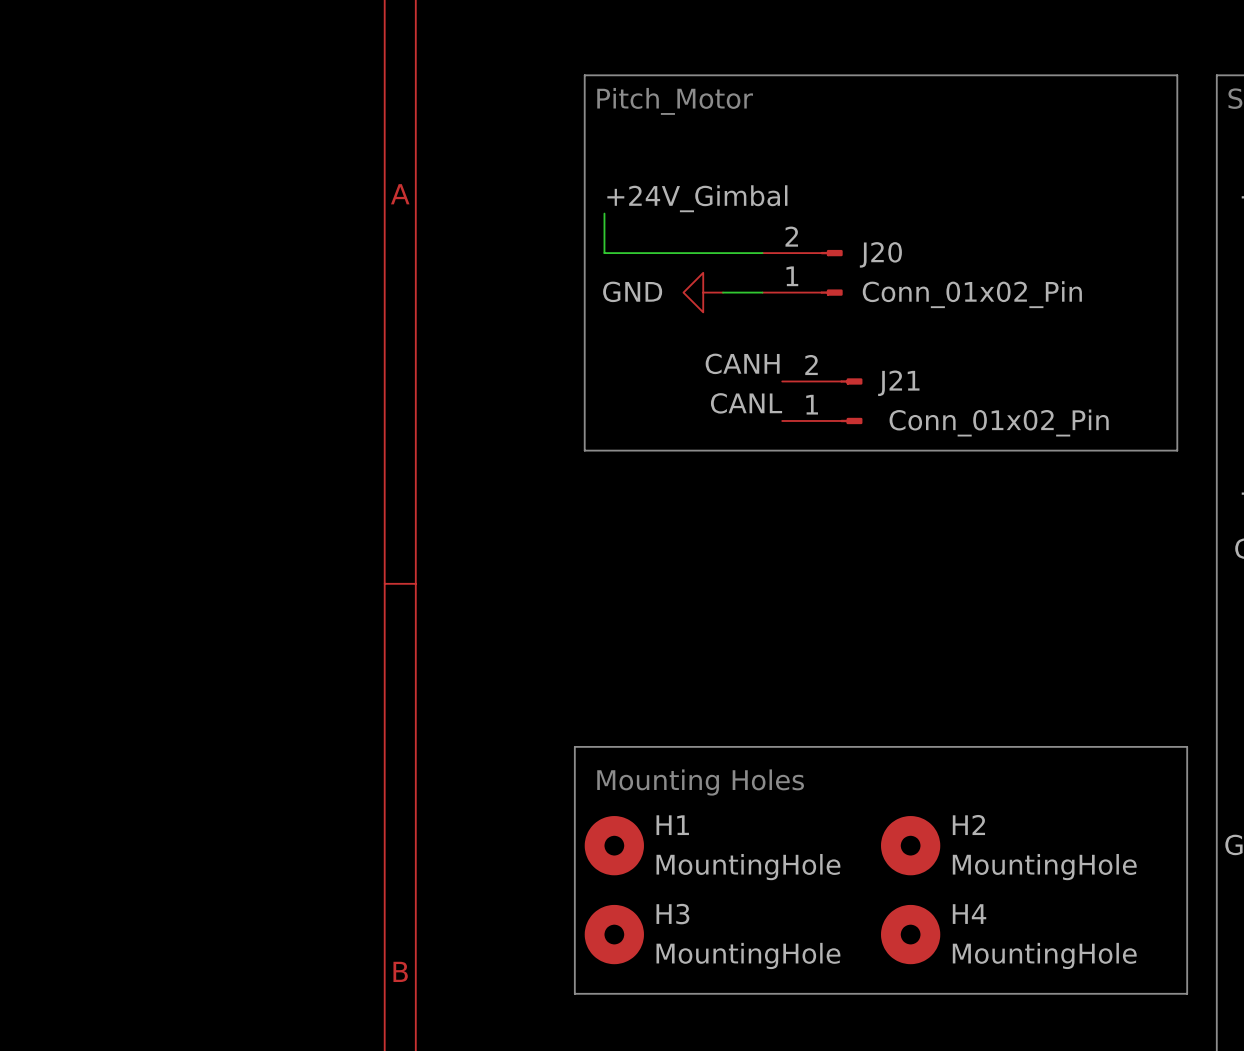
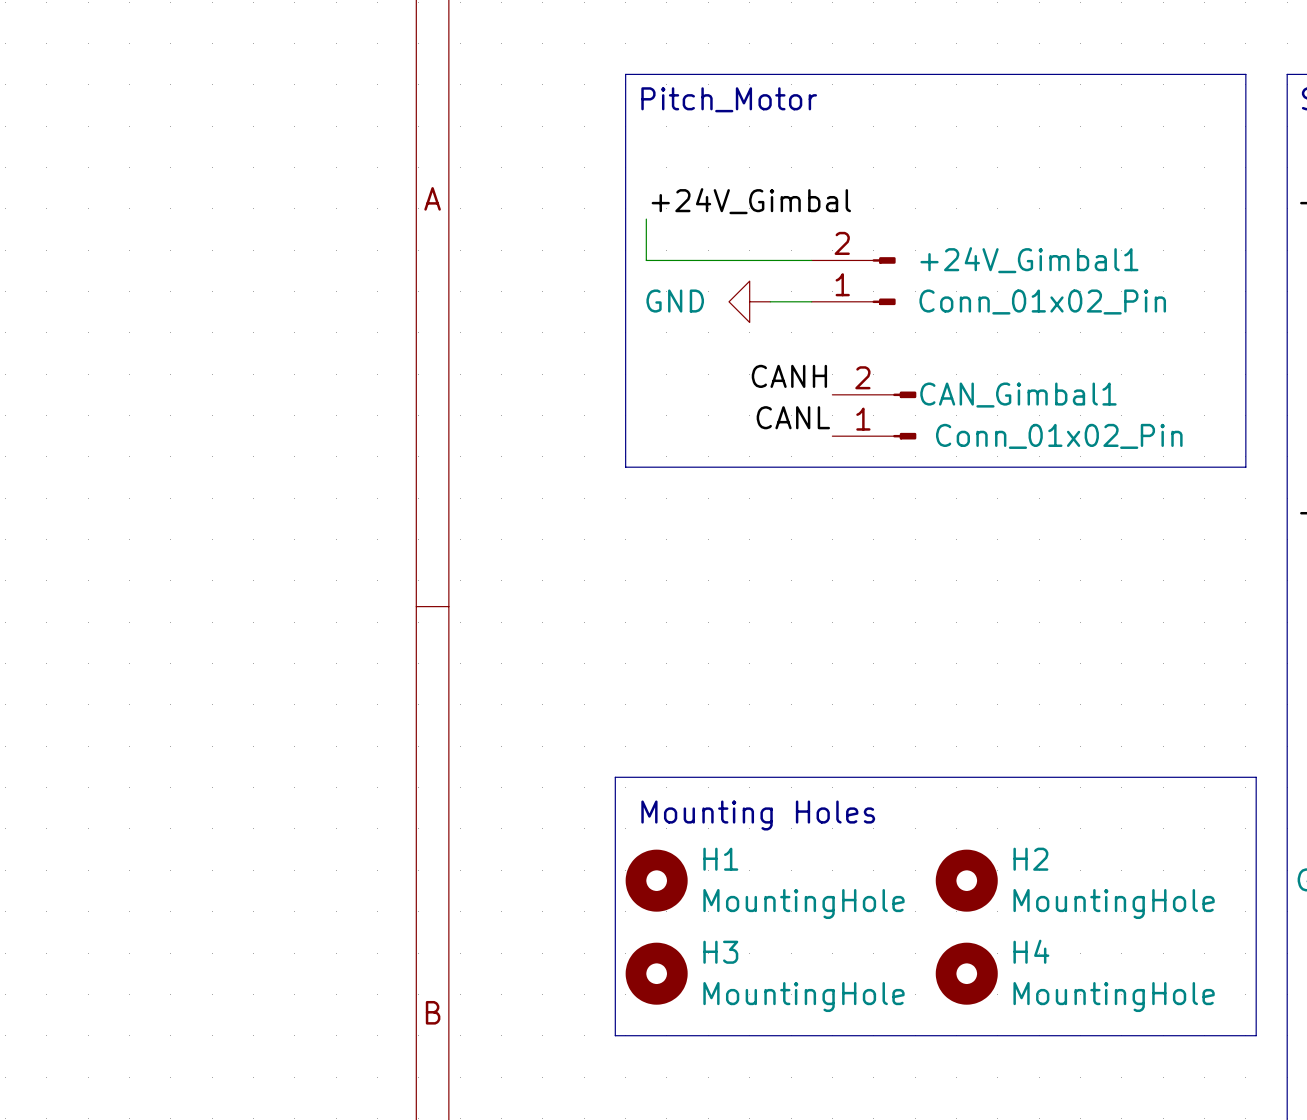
J20 name: J20 (880, 254) -> +24V_Gimbal1 (1029, 260)
J21 name: J21 (898, 383) -> CAN_Gimbal1 (1018, 395)

